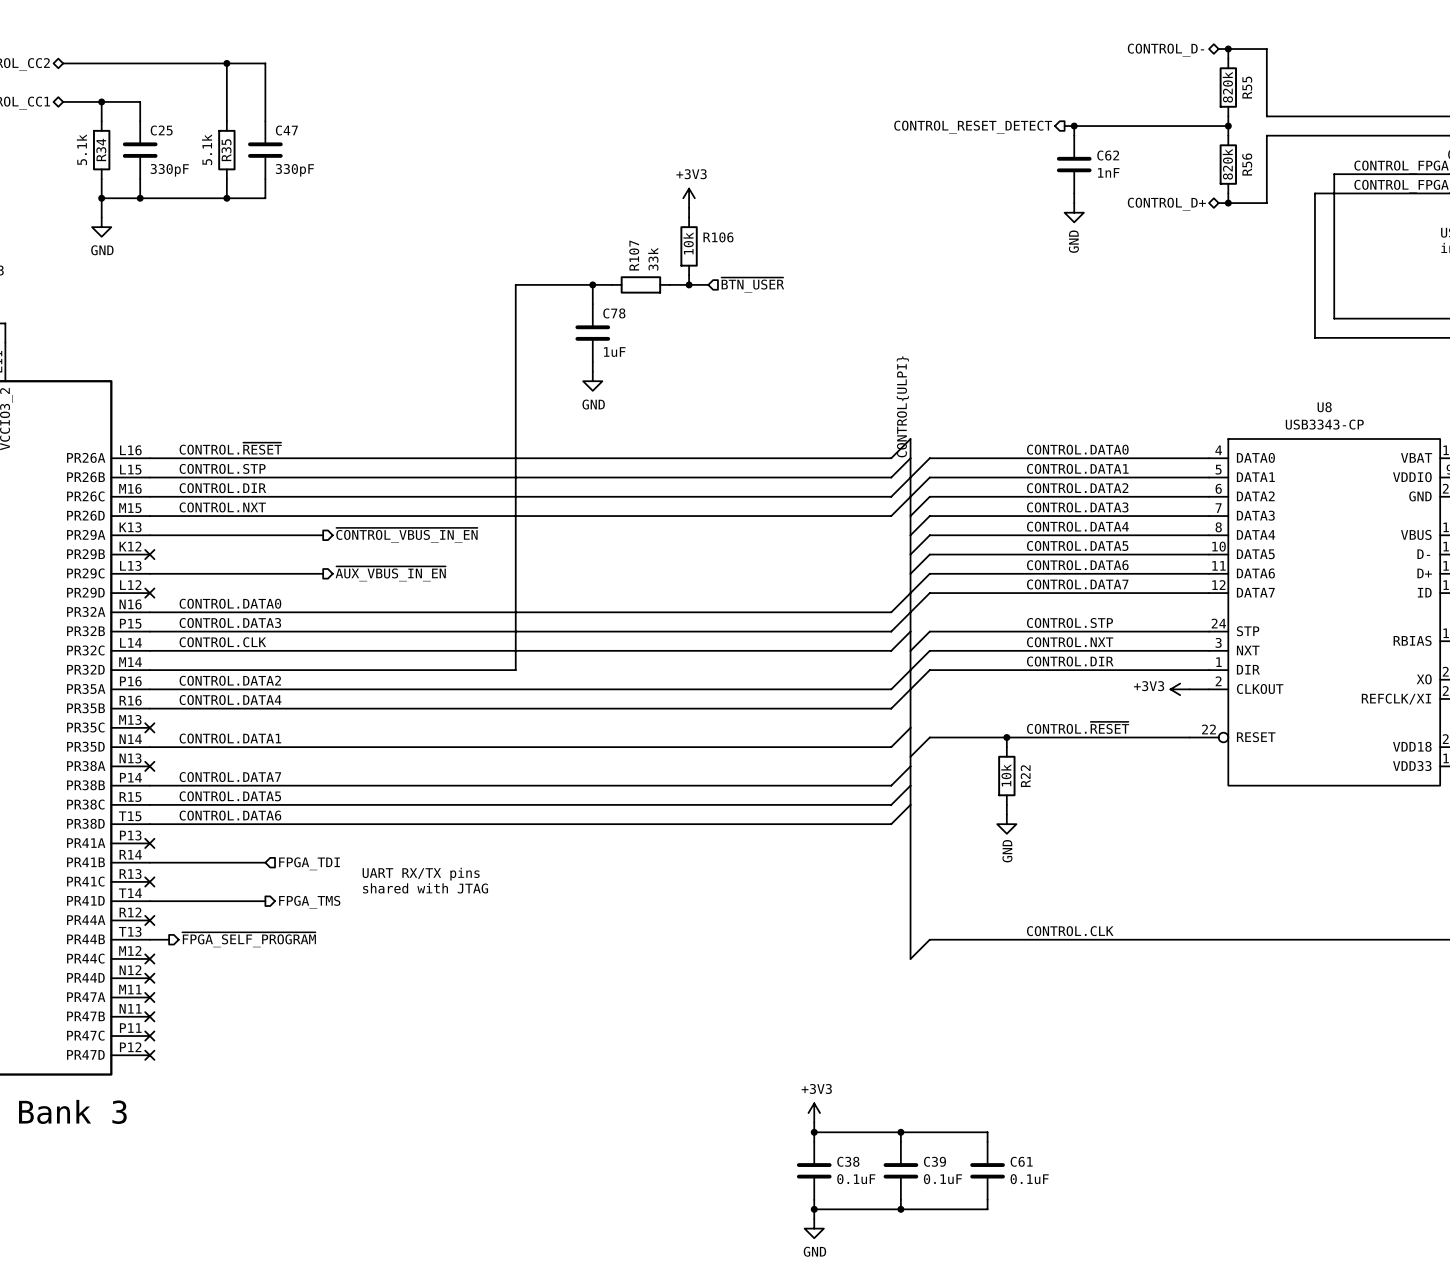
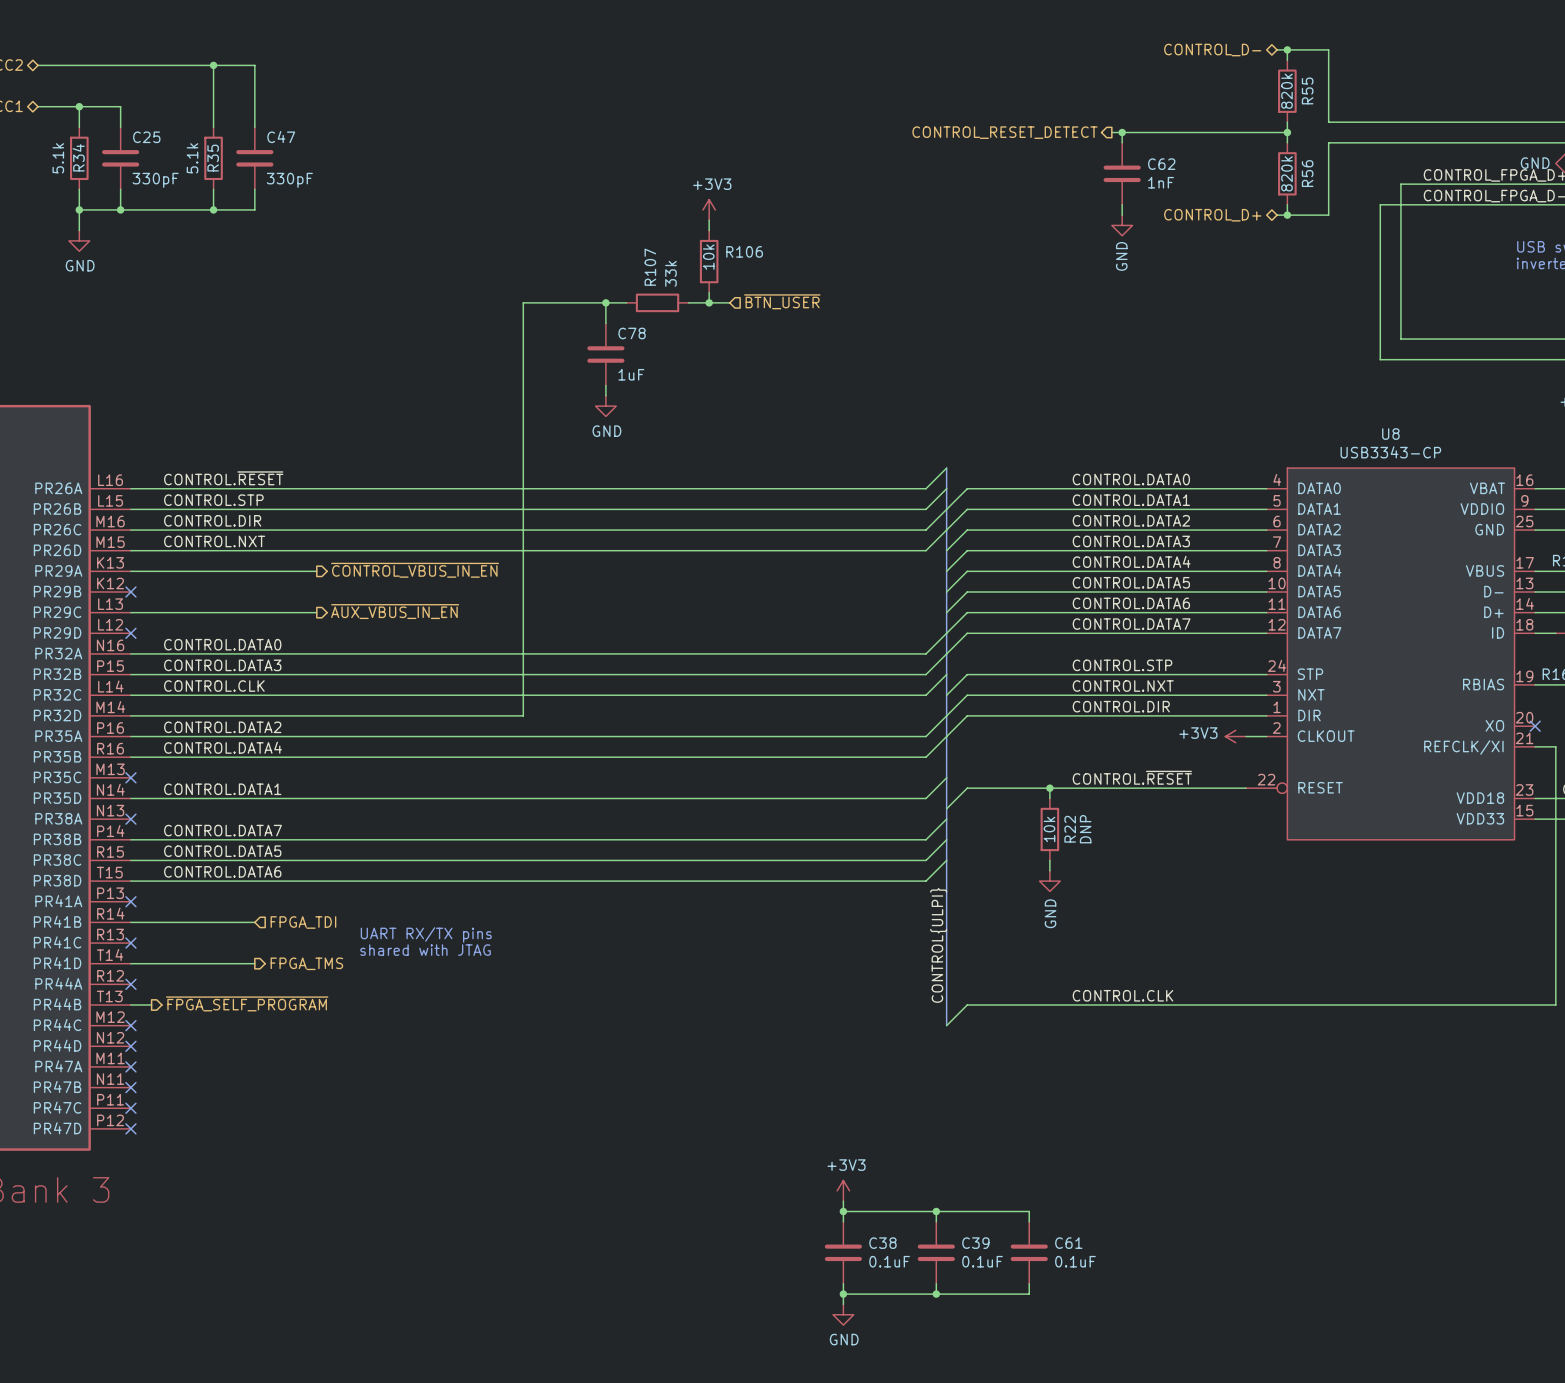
label: CONTROL{ULPI} (902, 406) -> none
R22 text: none -> DNP (1085, 829)
label: none -> CONTROL{ULPI} (938, 945)

